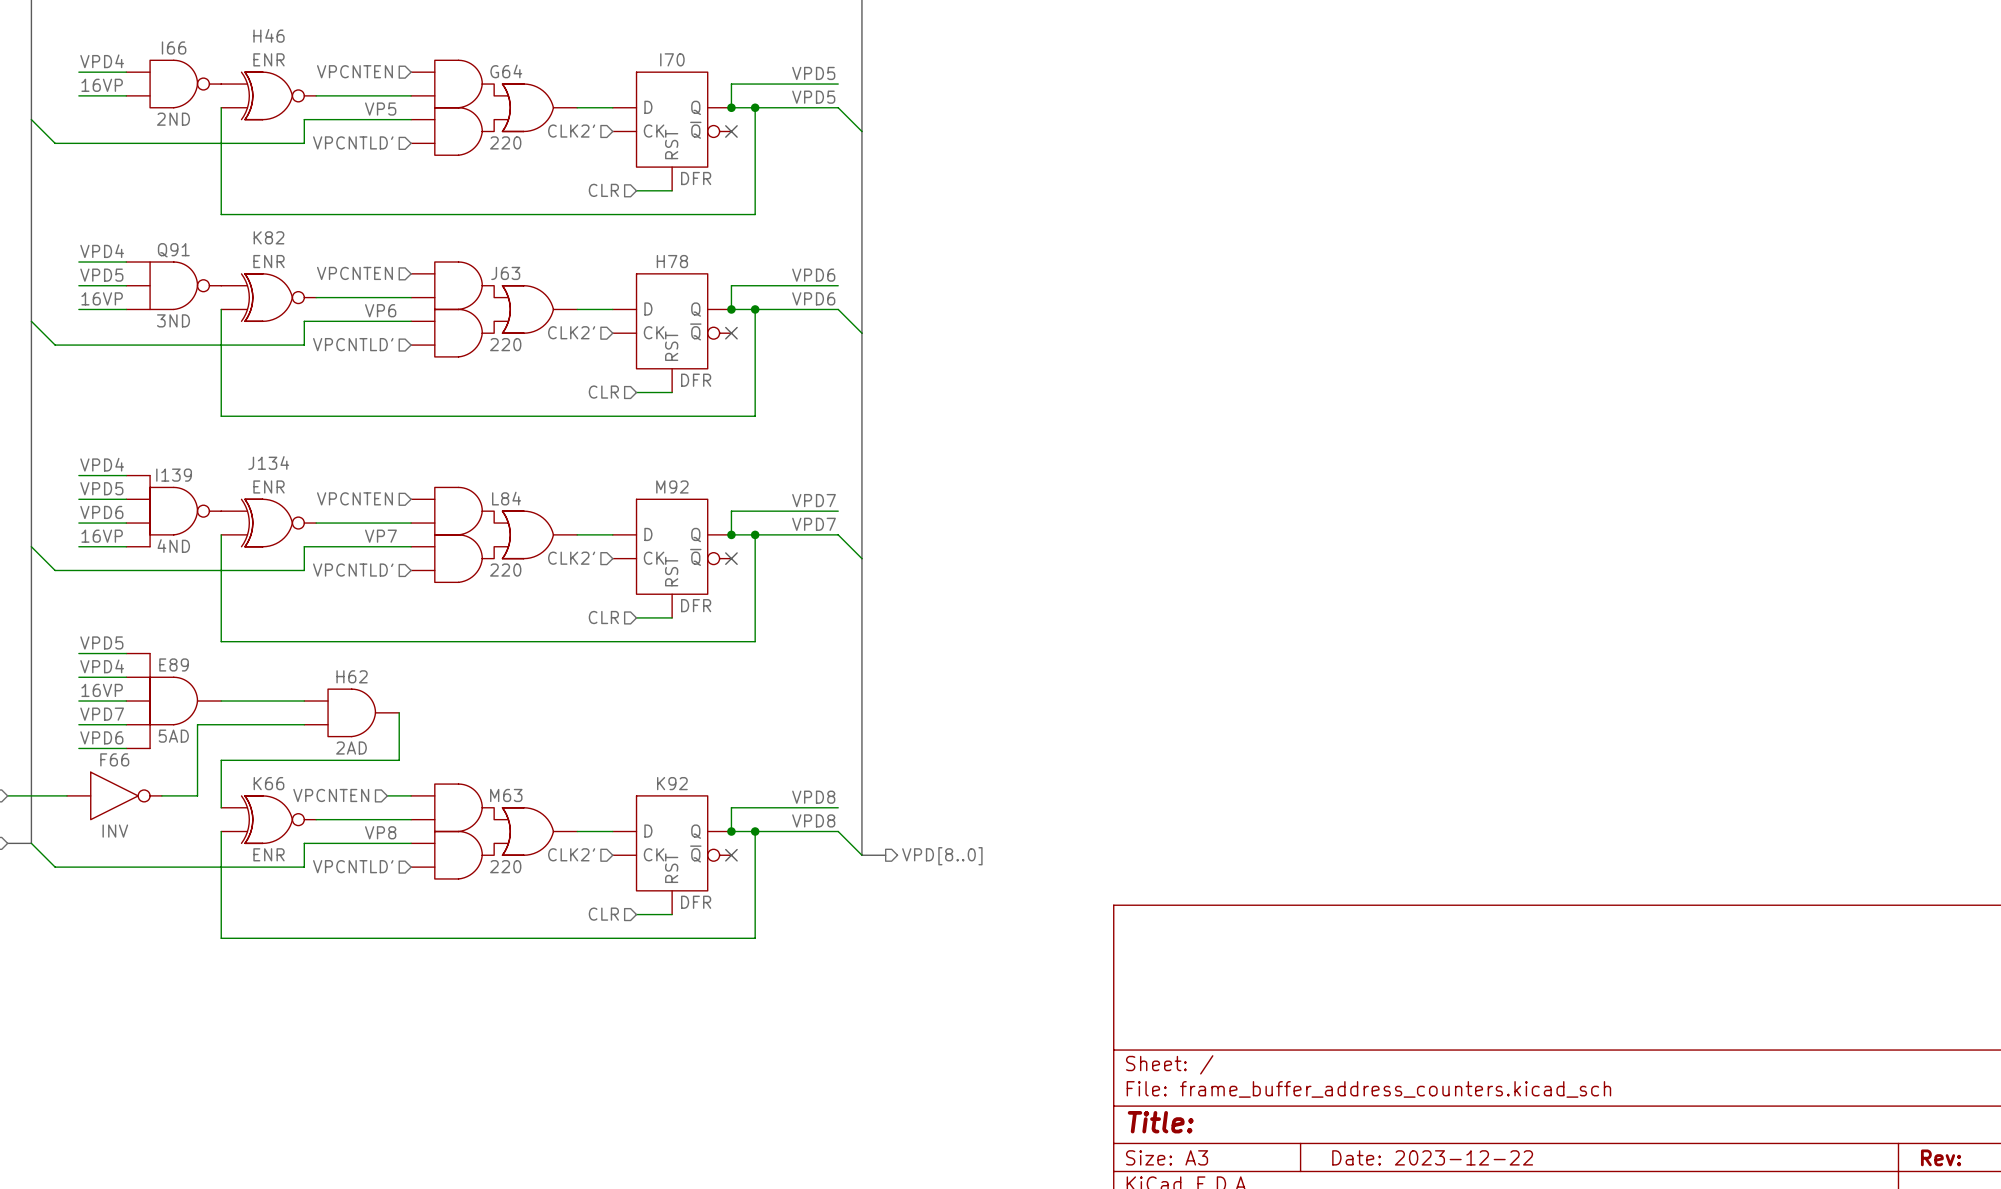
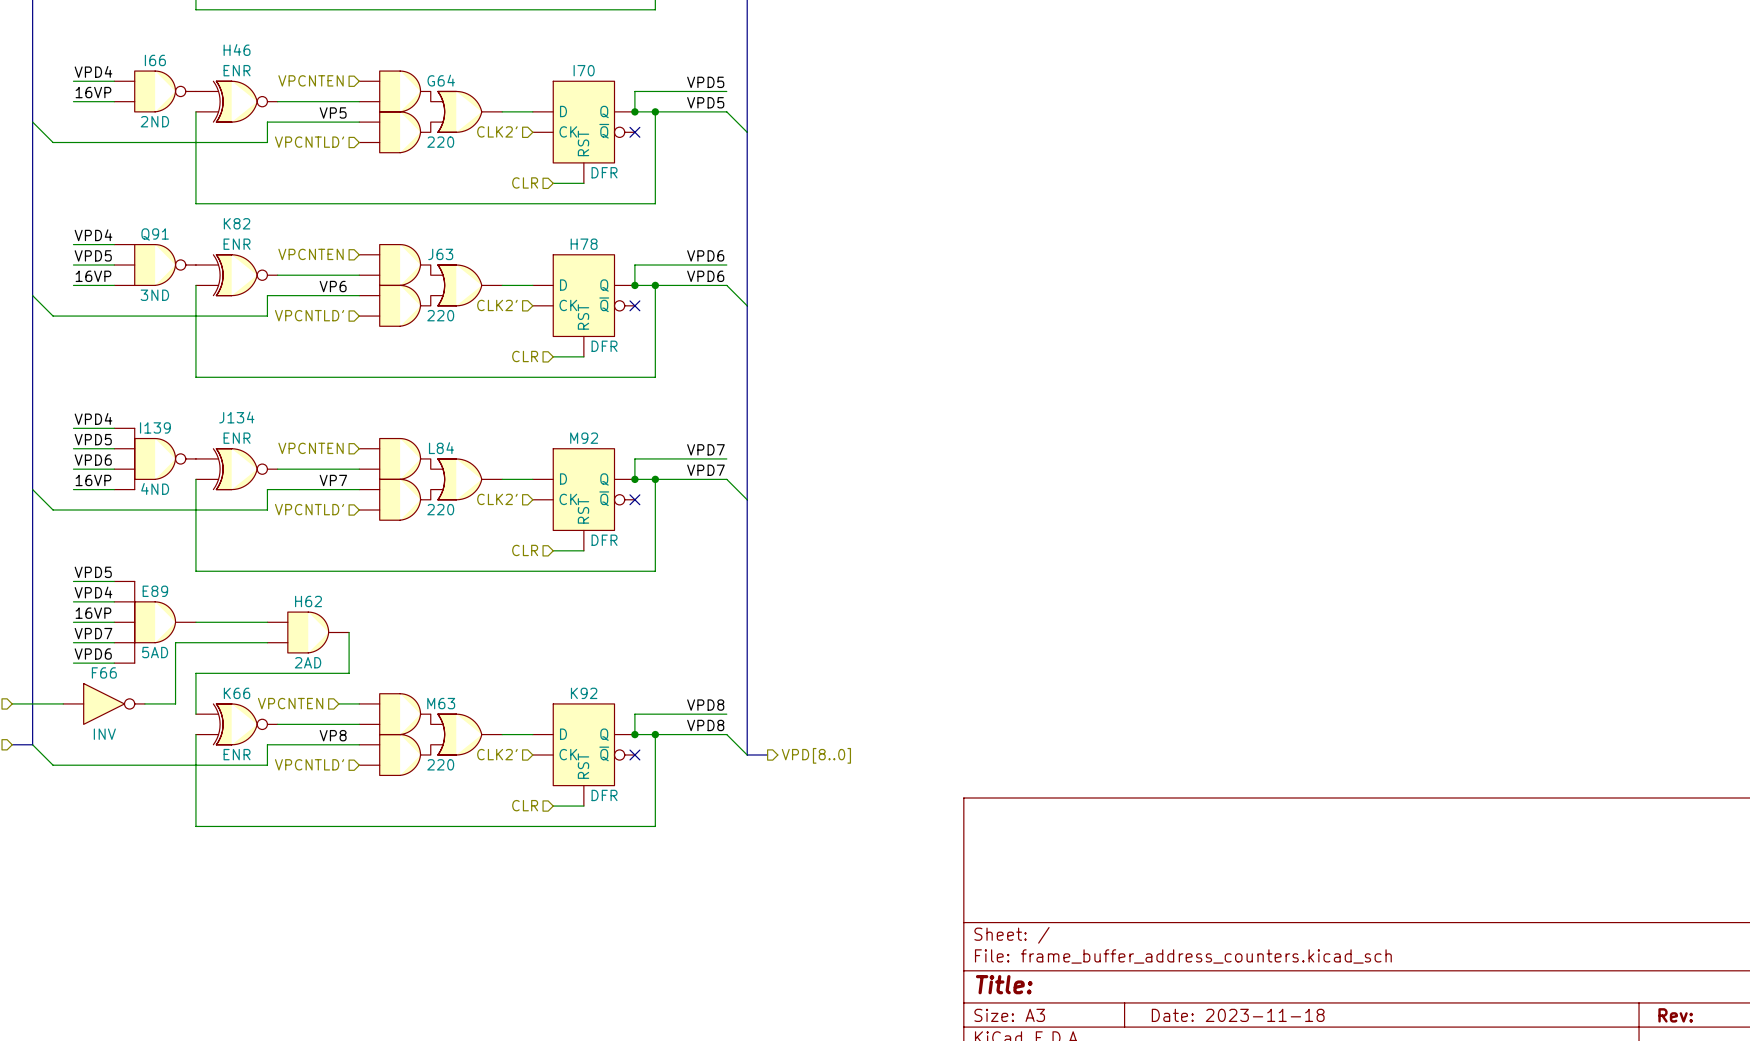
title block: Date: 2023-12-22 (1432, 1157) -> Date: 2023-11-18 (1238, 1015)

